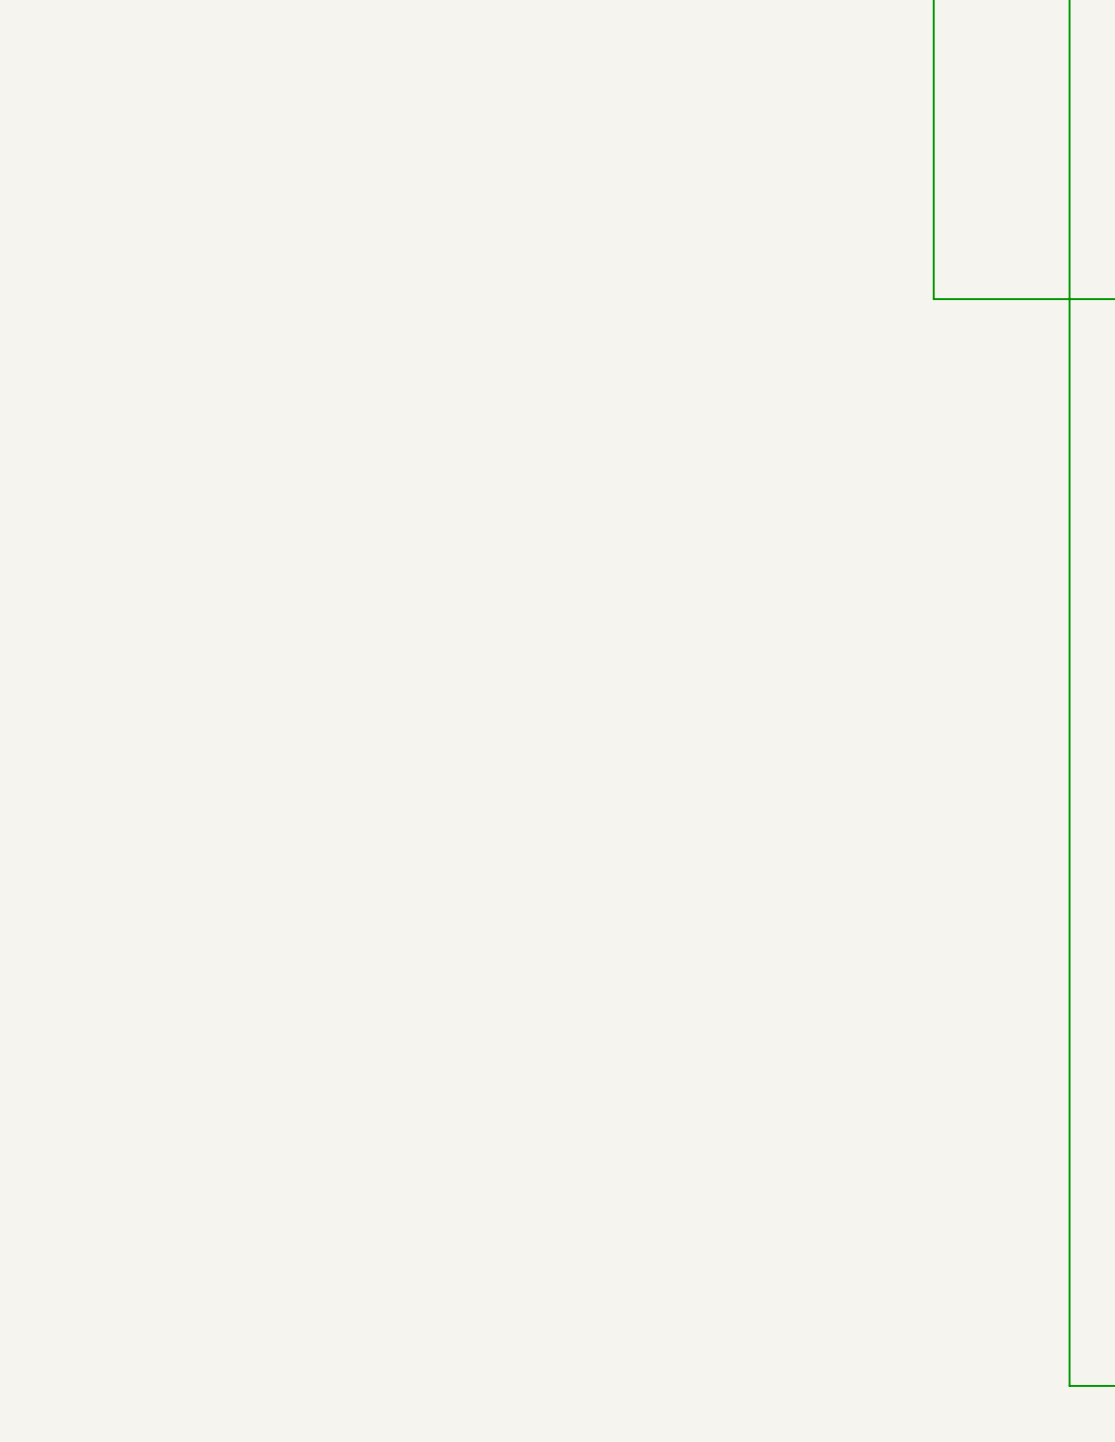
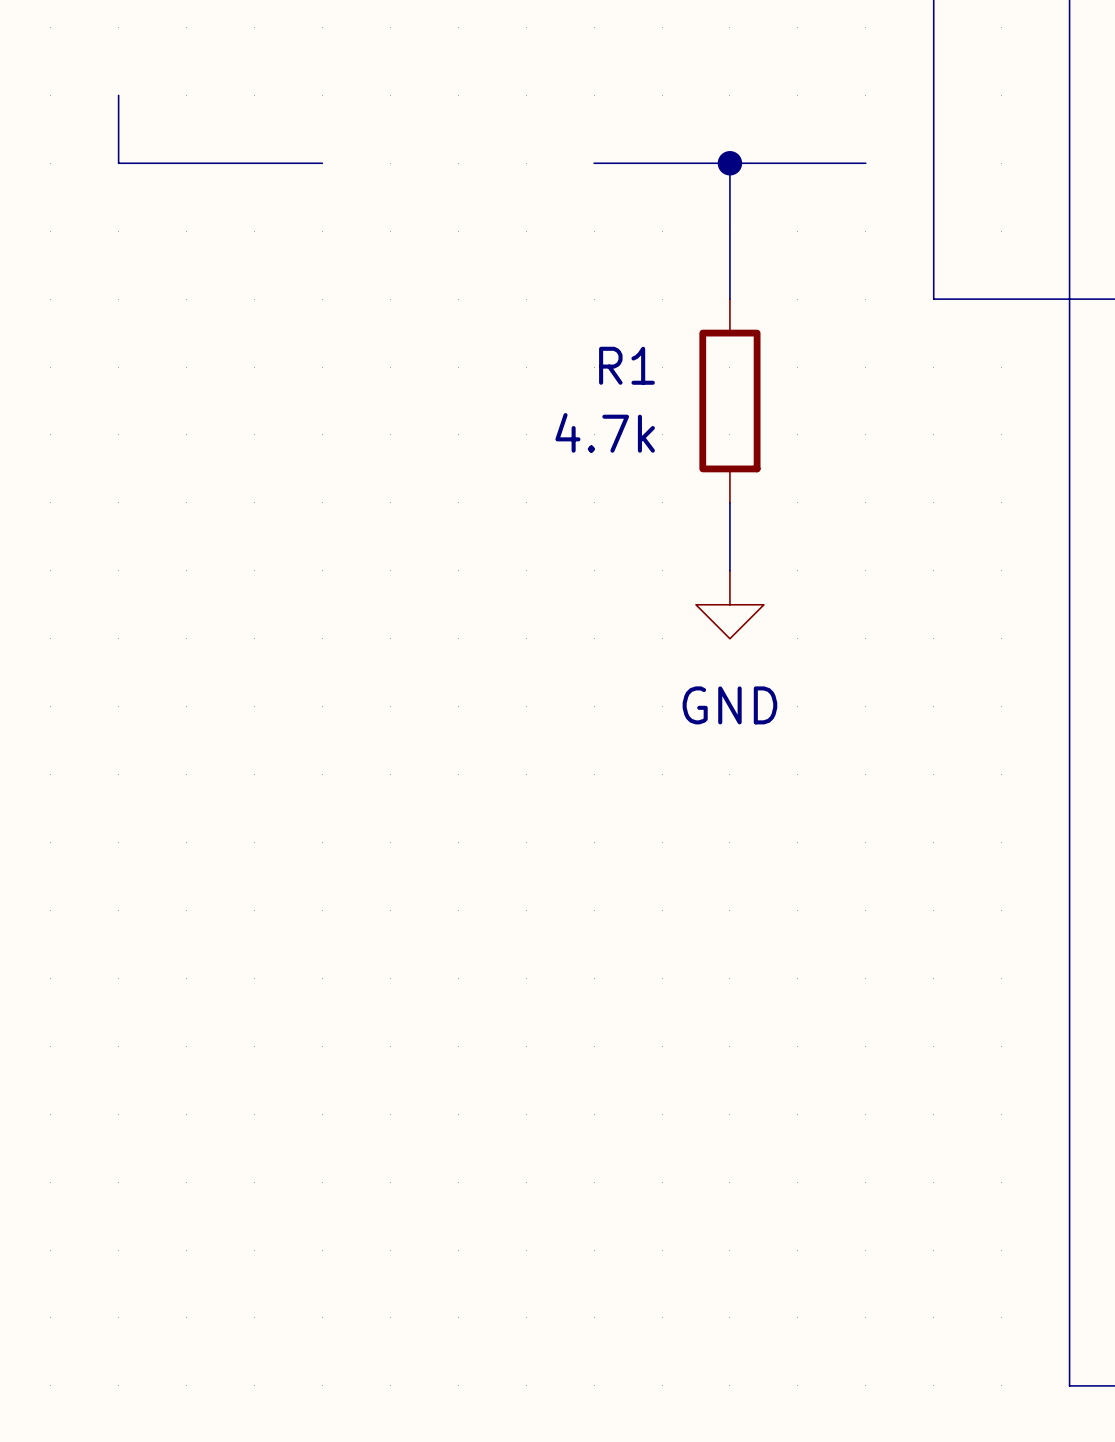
wire: none -> (118, 95) (118, 163) (322, 163)
wire: none -> (594, 163) (865, 163)
wire: none -> (729, 163) (729, 299)
junction: none -> (729, 163)
R1: none -> 4.7k (729, 401)
wire: none -> (729, 502) (729, 570)
power symbol: none -> GND (729, 604)

